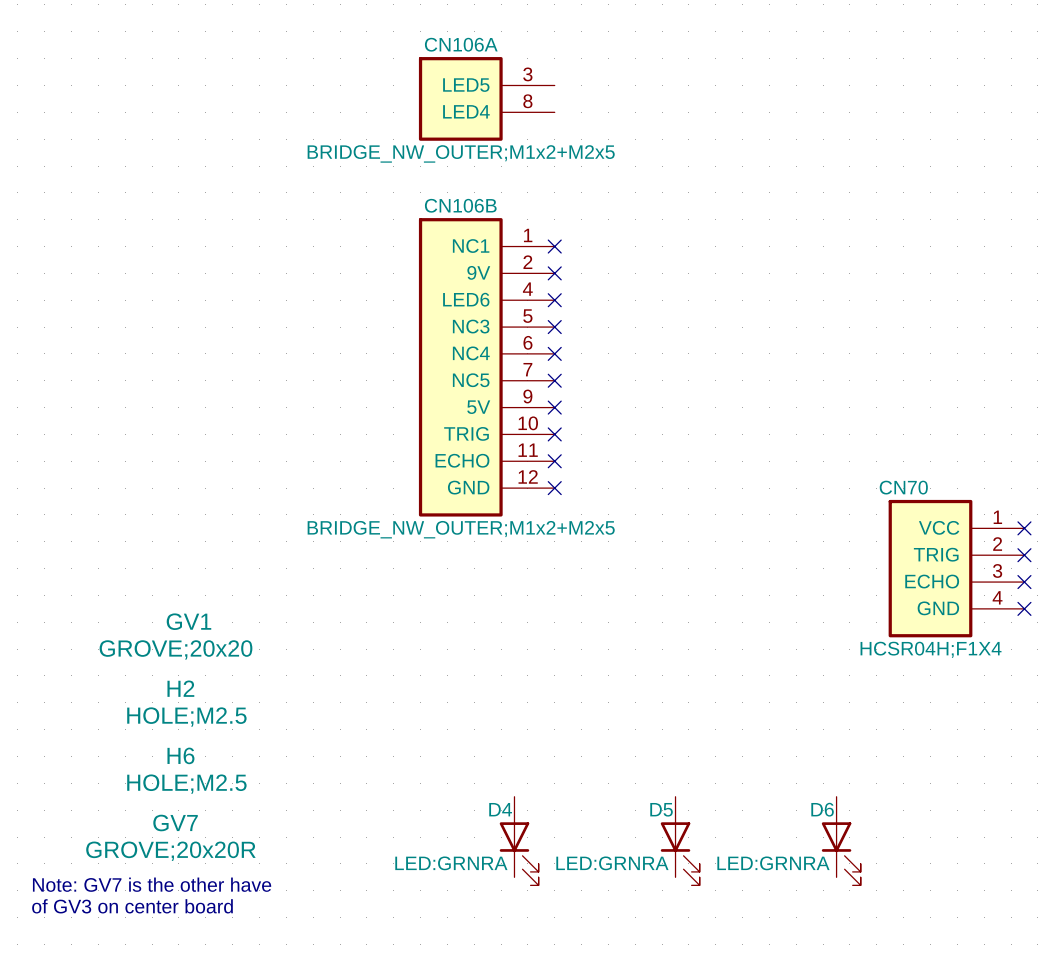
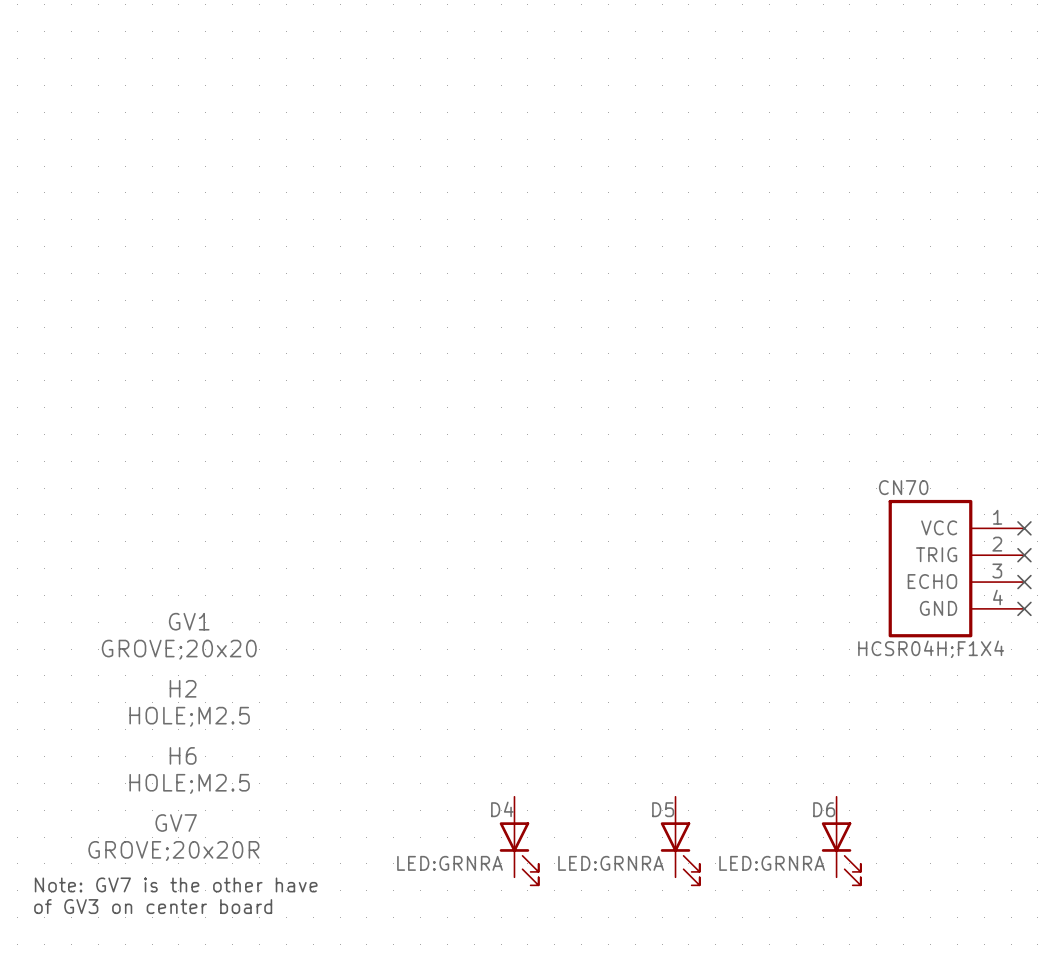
CN106A: BRIDGE_NW_OUTER;M1x2+M2x5 (486, 98) -> none
no-connect mark: (554, 246) -> none
no-connect mark: (554, 273) -> none
no-connect mark: (554, 300) -> none
no-connect mark: (554, 327) -> none
no-connect mark: (554, 353) -> none
CN106B: BRIDGE_NW_OUTER;M1x2+M2x5 (486, 367) -> none
no-connect mark: (554, 380) -> none
no-connect mark: (554, 407) -> none
no-connect mark: (554, 434) -> none
no-connect mark: (554, 461) -> none
no-connect mark: (554, 488) -> none

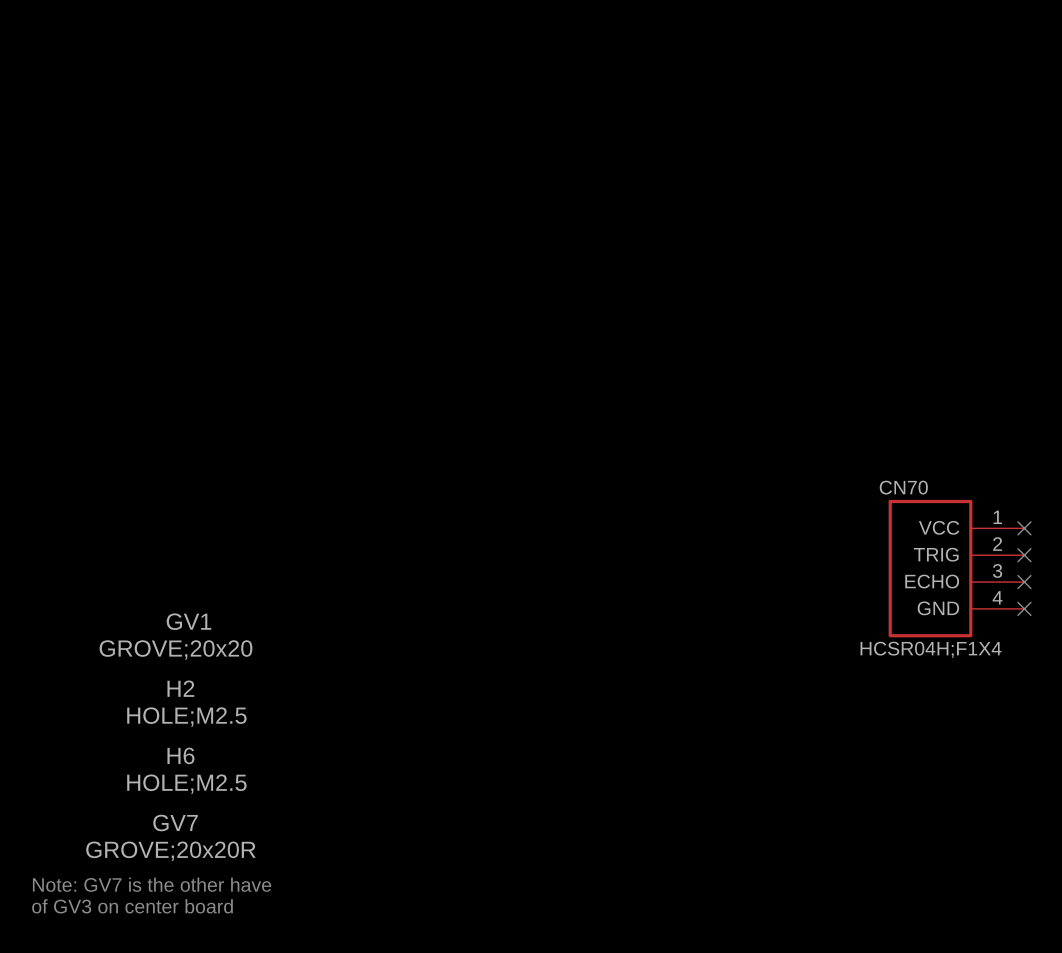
D4: LED:GRNRA (519, 841) -> none
D5: LED:GRNRA (680, 841) -> none
D6: LED:GRNRA (841, 841) -> none

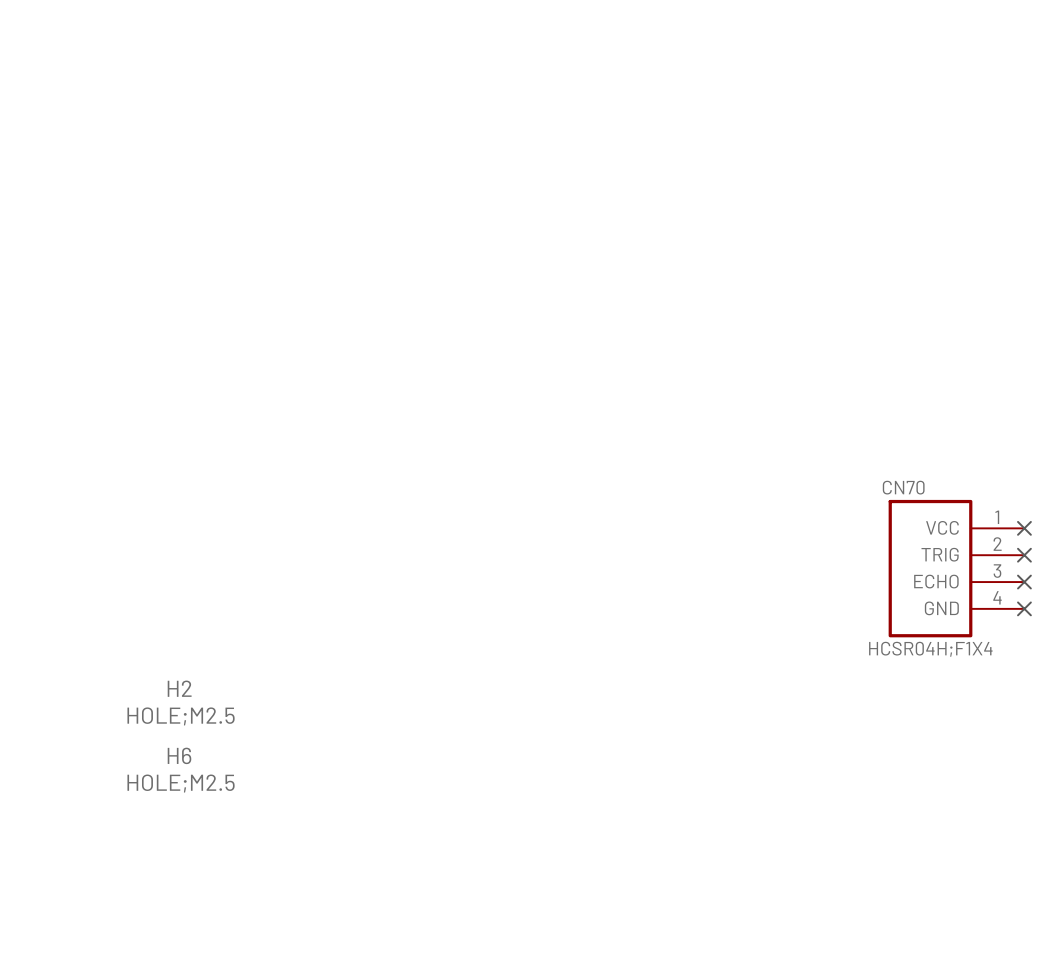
GV1: GROVE;20x20 (175, 636) -> none
GV7: GROVE;20x20R (170, 837) -> none
text: Note: GV7 is the other have (152, 884) -> none
text: of GV3 on center board (132, 906) -> none

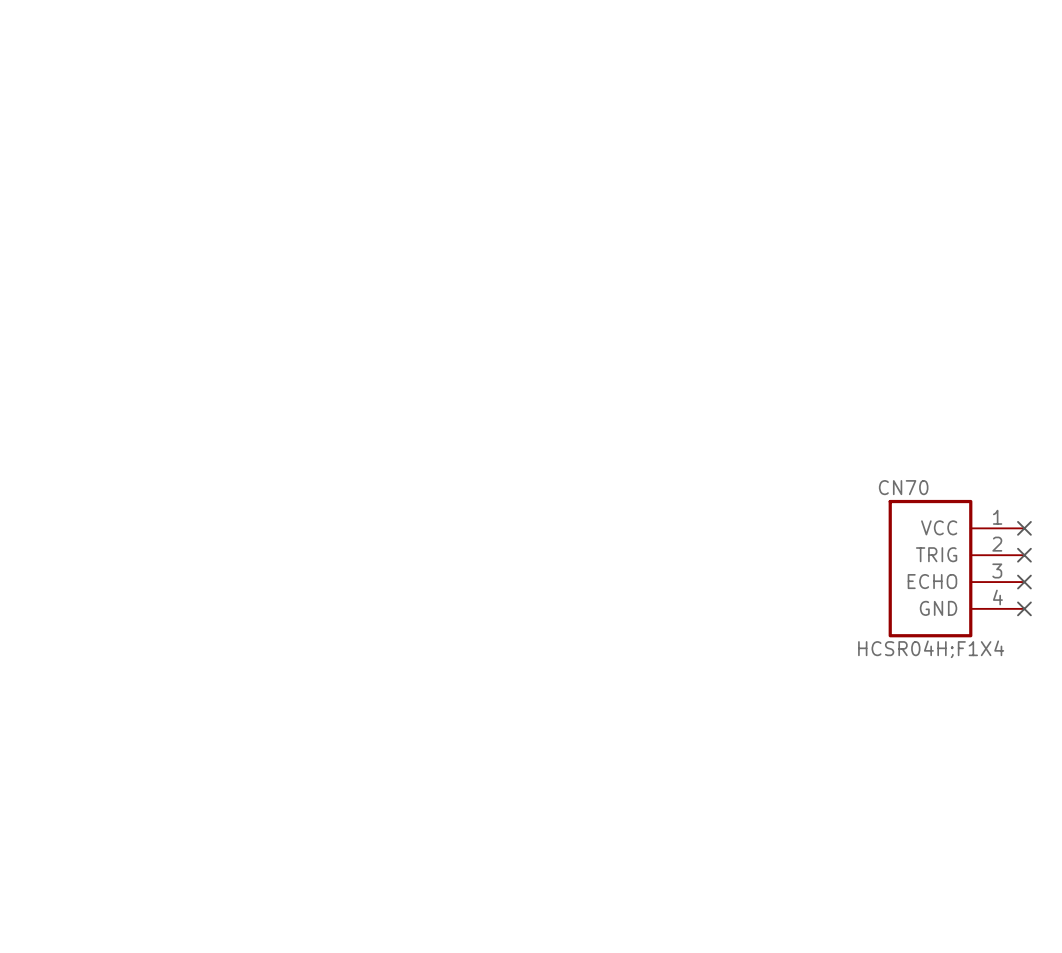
H2: HOLE;M2.5 (181, 703) -> none
H6: HOLE;M2.5 (181, 770) -> none

